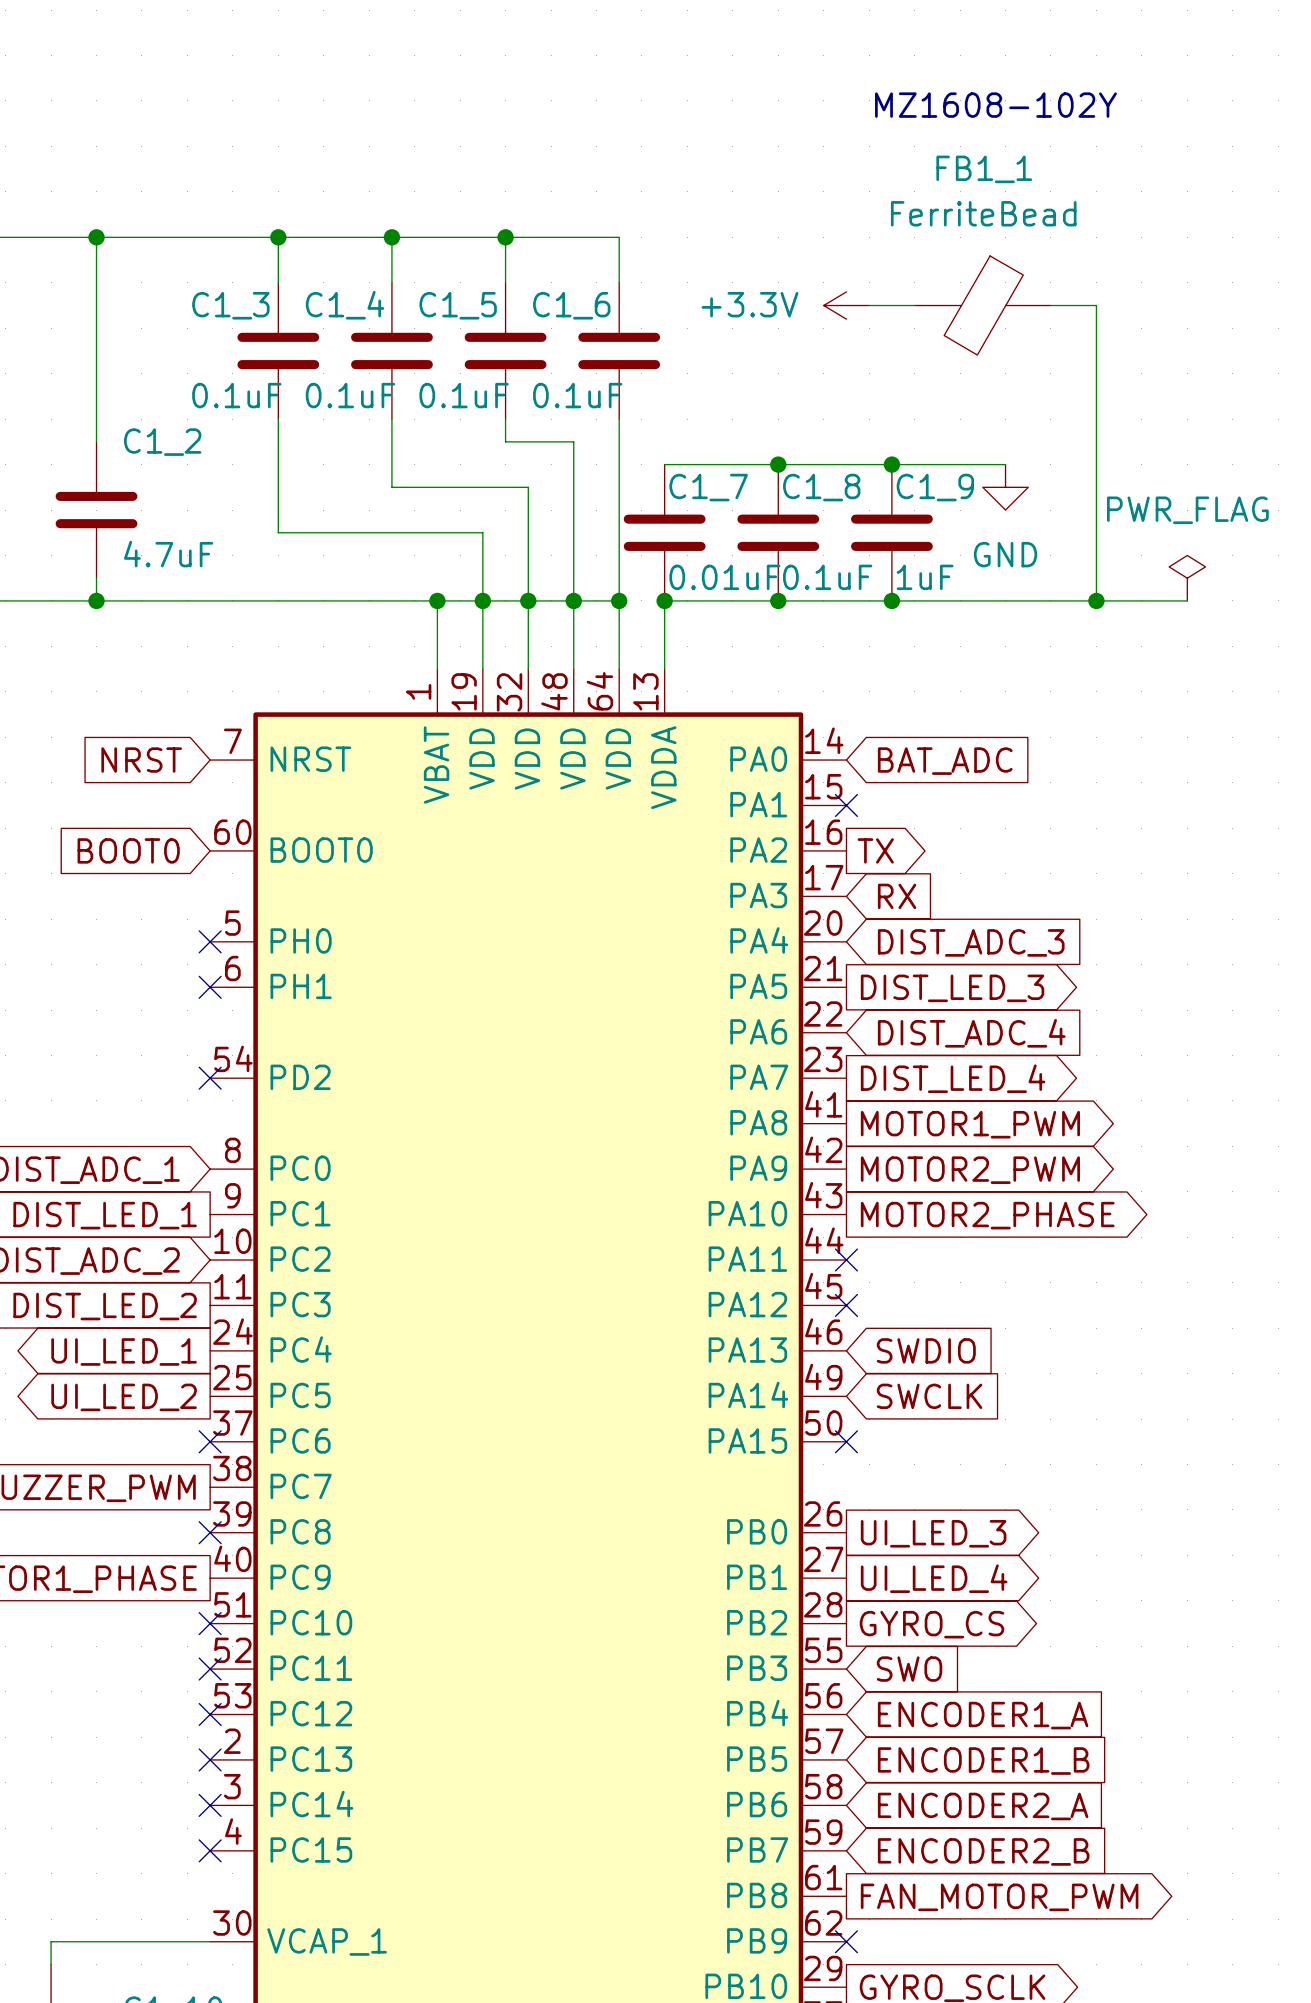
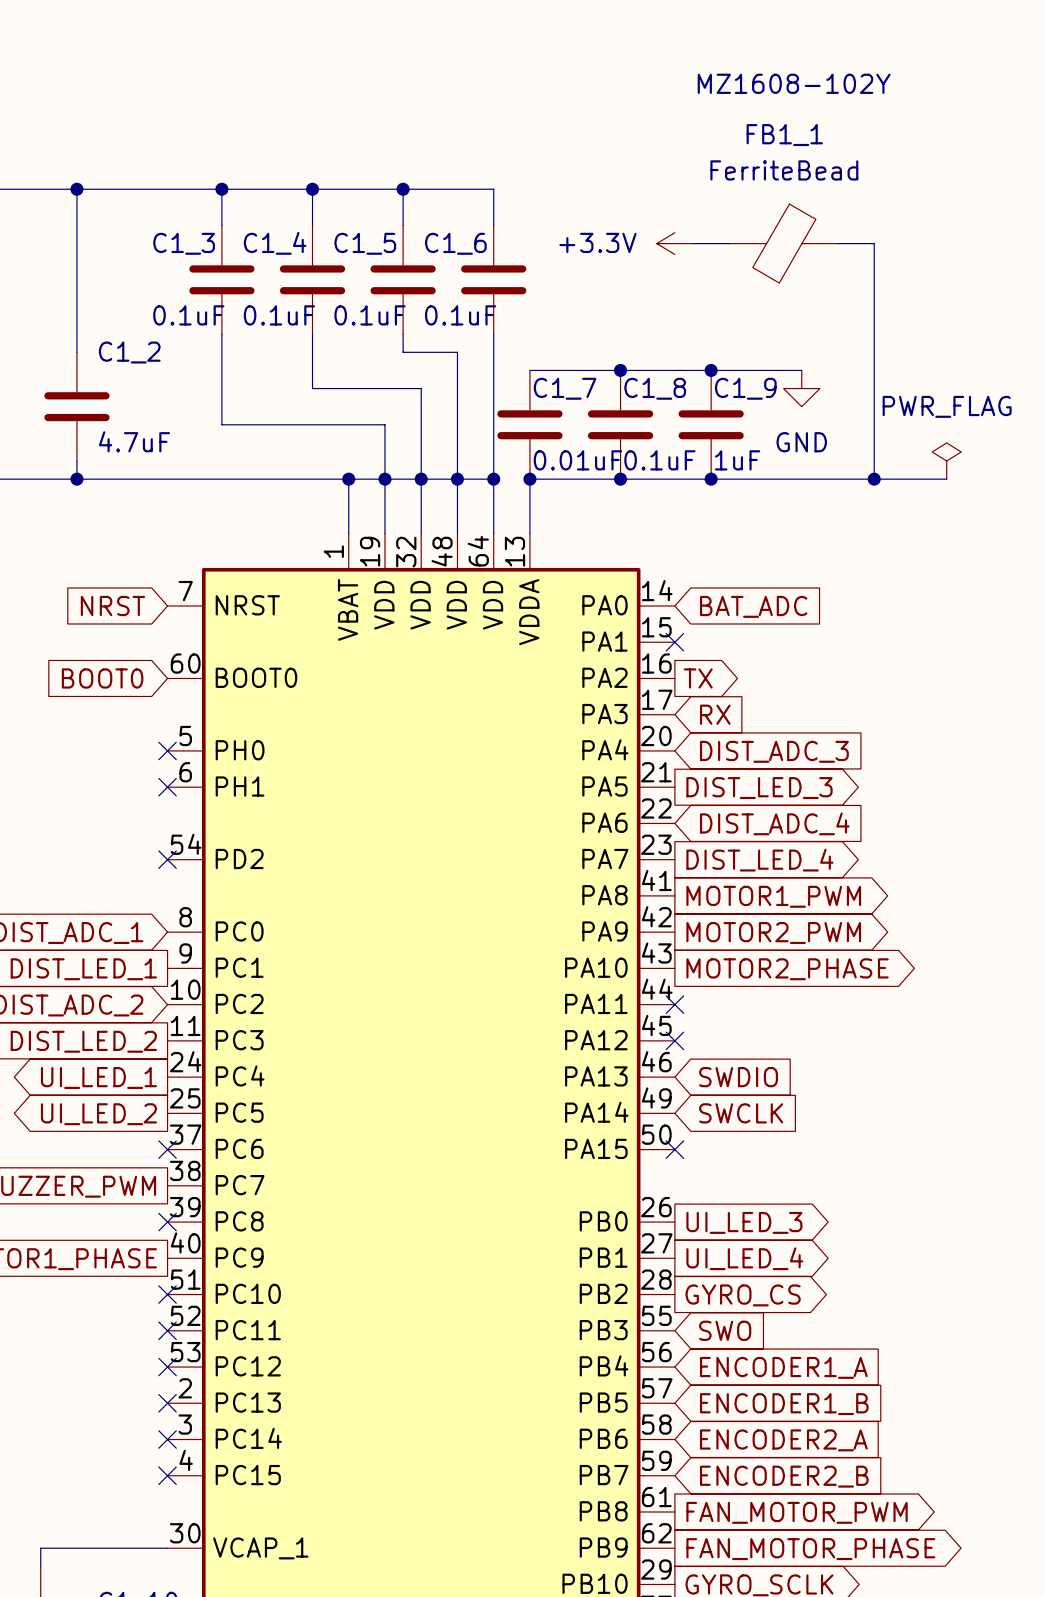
no-connect mark: (846, 1941) -> none
global label: none -> FAN_MOTOR_PHASE (810, 1549)

